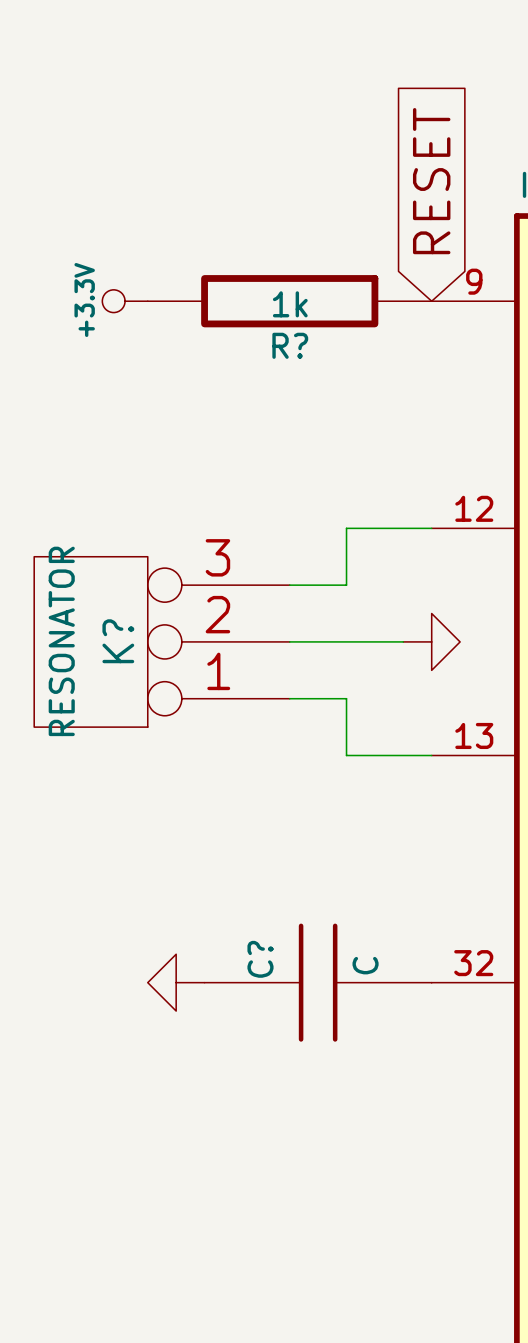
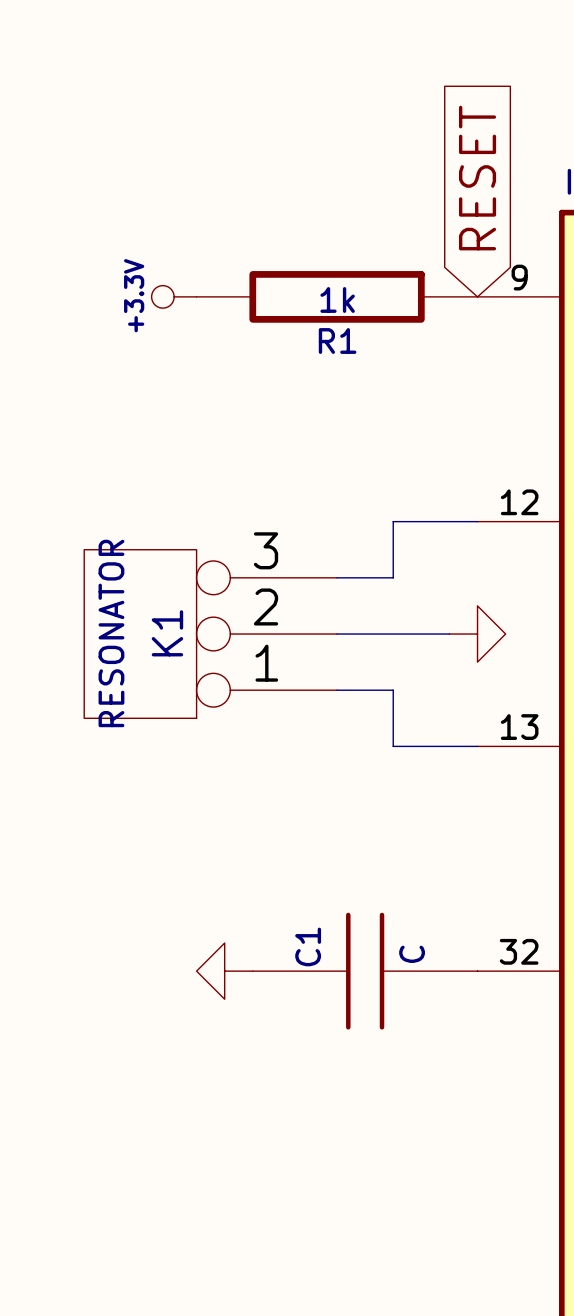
R? name: R? (290, 345) -> R1 (337, 341)
K? name: K? (118, 641) -> K1 (167, 633)
C? name: C? (260, 959) -> C1 (308, 946)

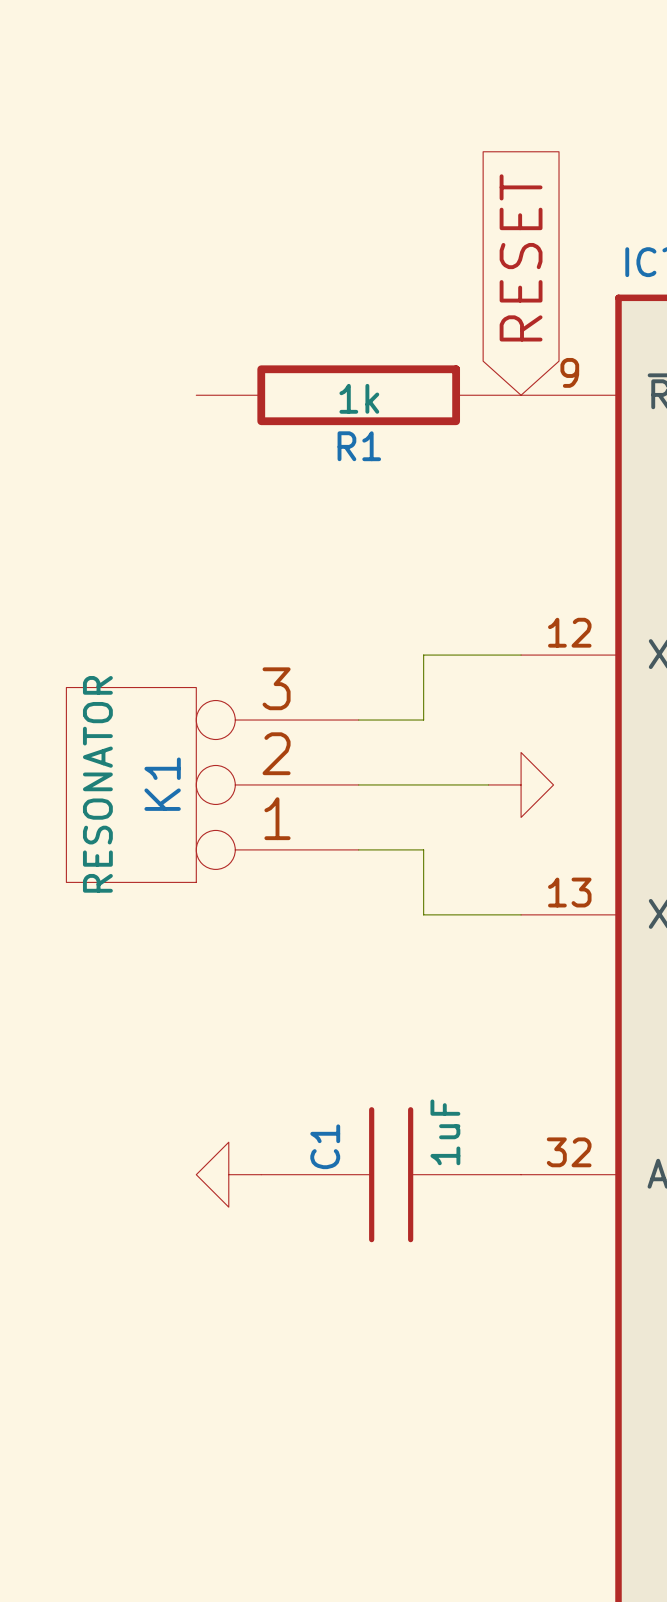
power symbol: +3.3V (174, 296) -> none
C1 value: C (412, 954) -> 1uF (445, 1132)

